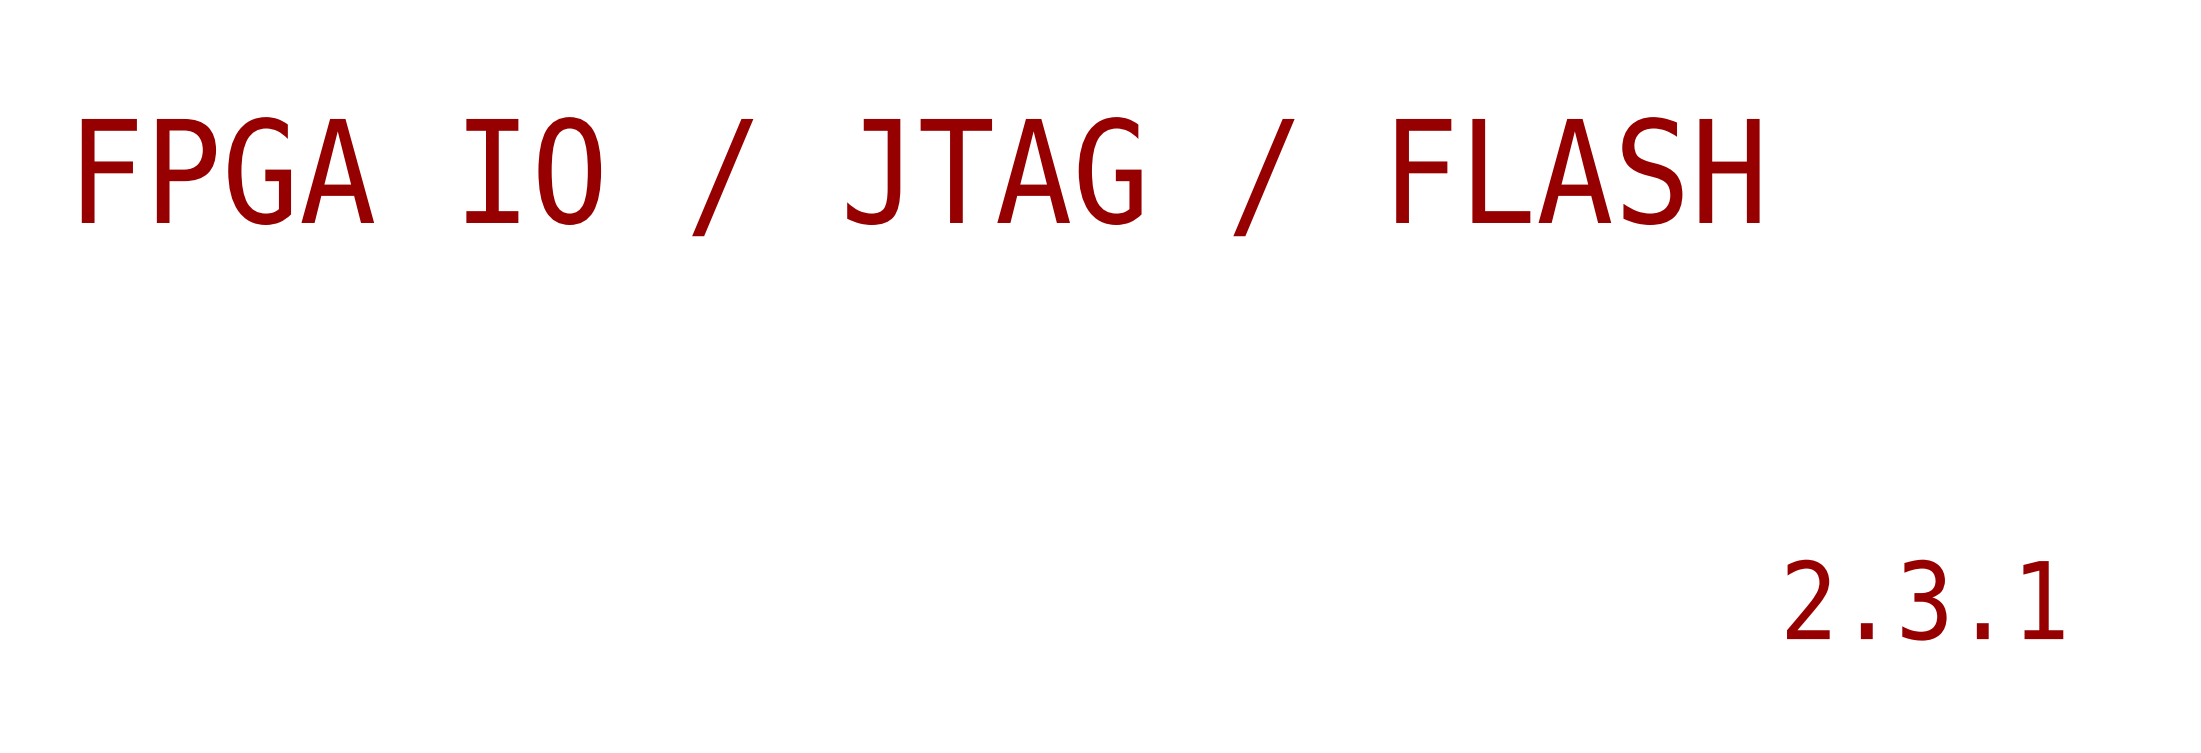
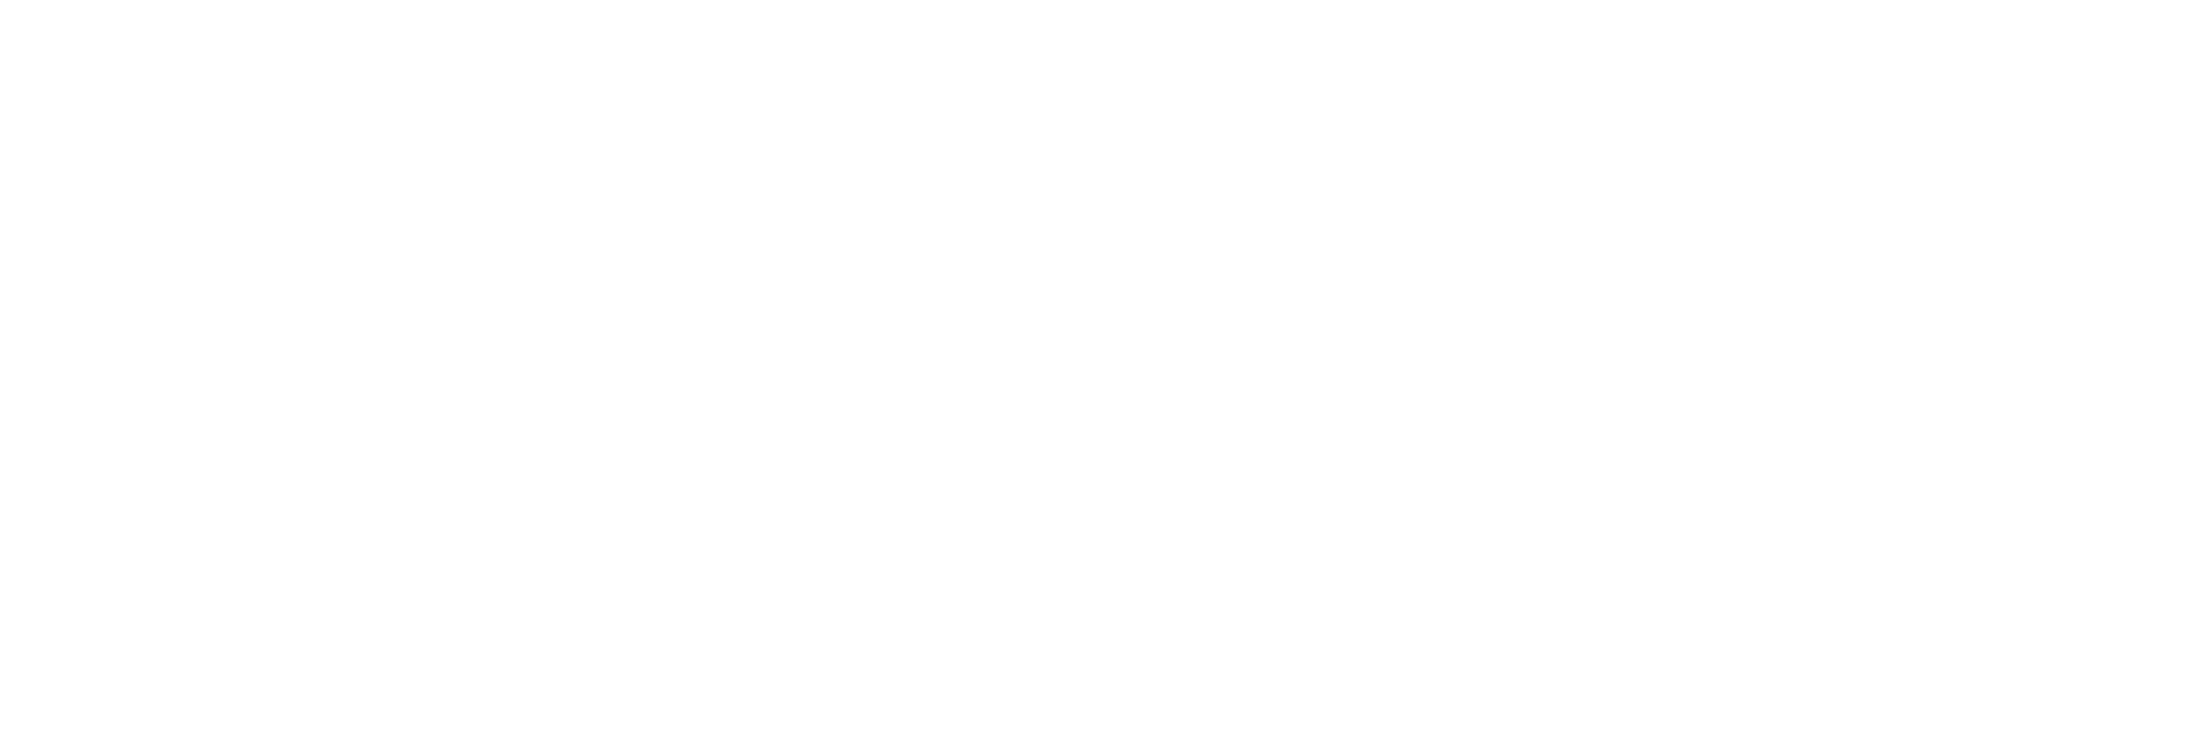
text: FPGA IO / JTAG / FLASH (920, 176) -> none
text: 2.3.1 (1925, 600) -> none

